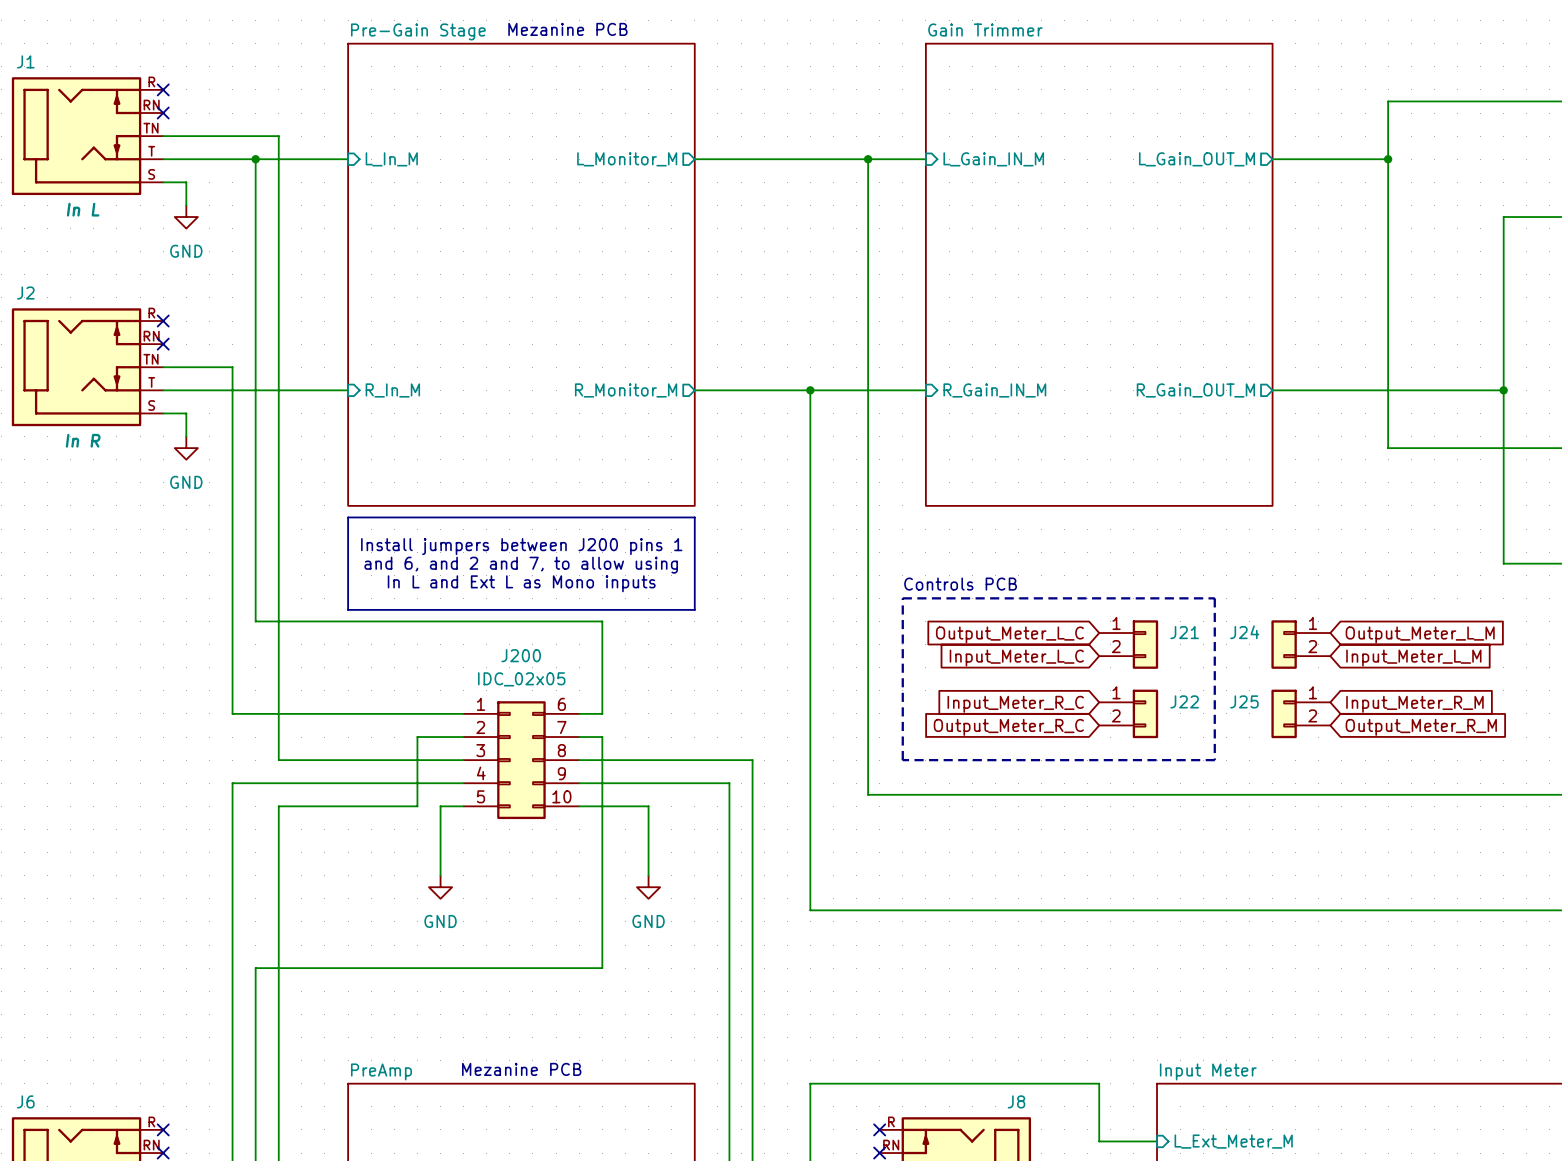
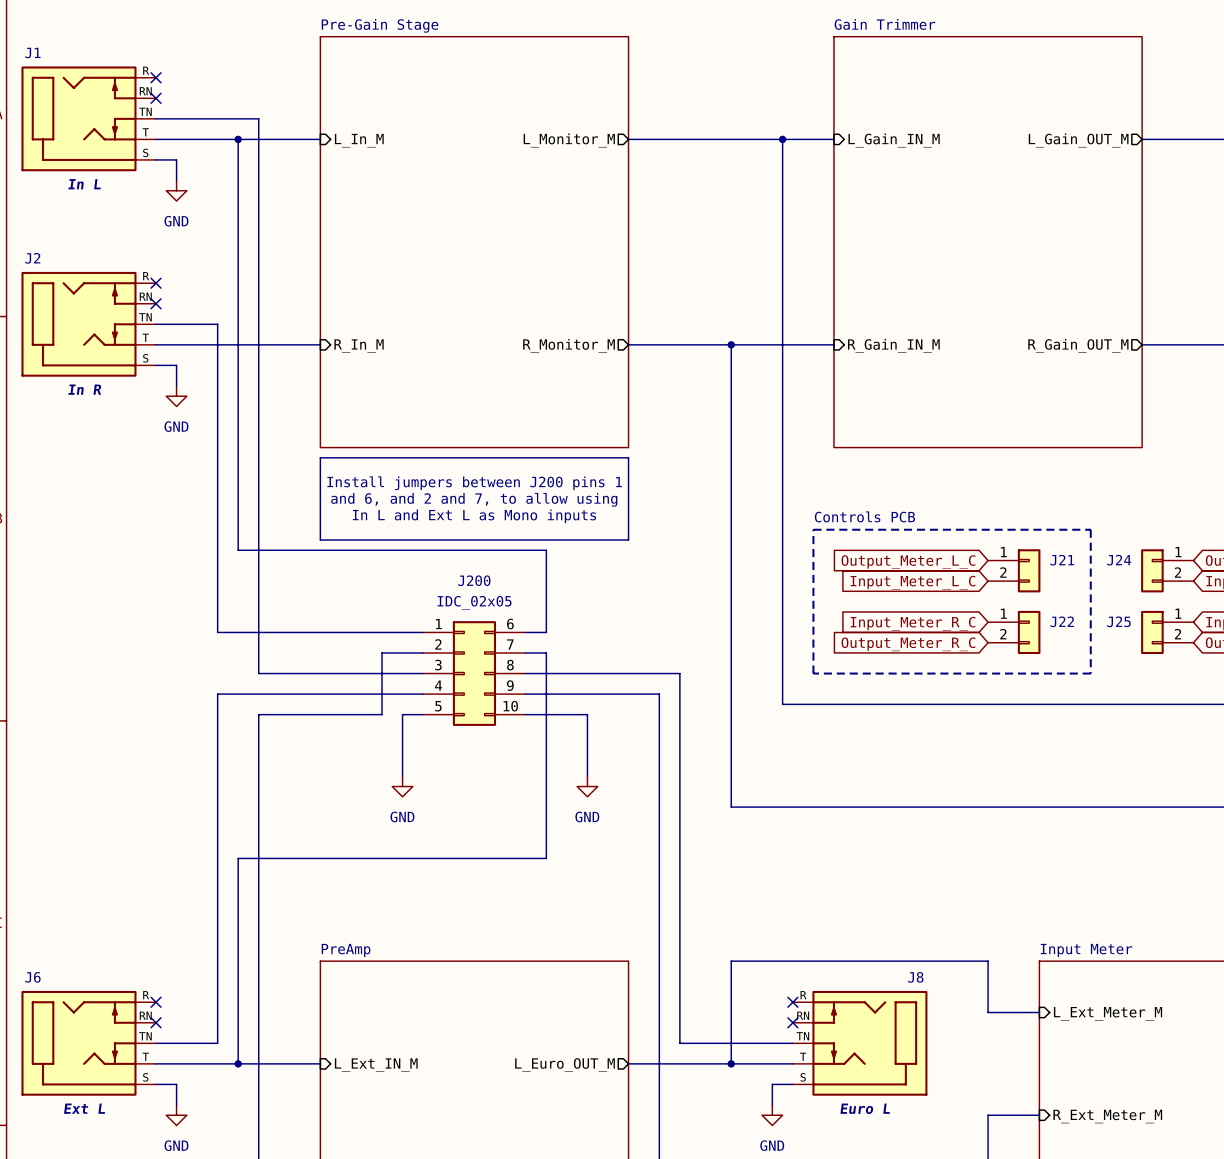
text: Mezanine PCB (567, 29) -> none
text: Mezanine PCB (521, 1069) -> none

